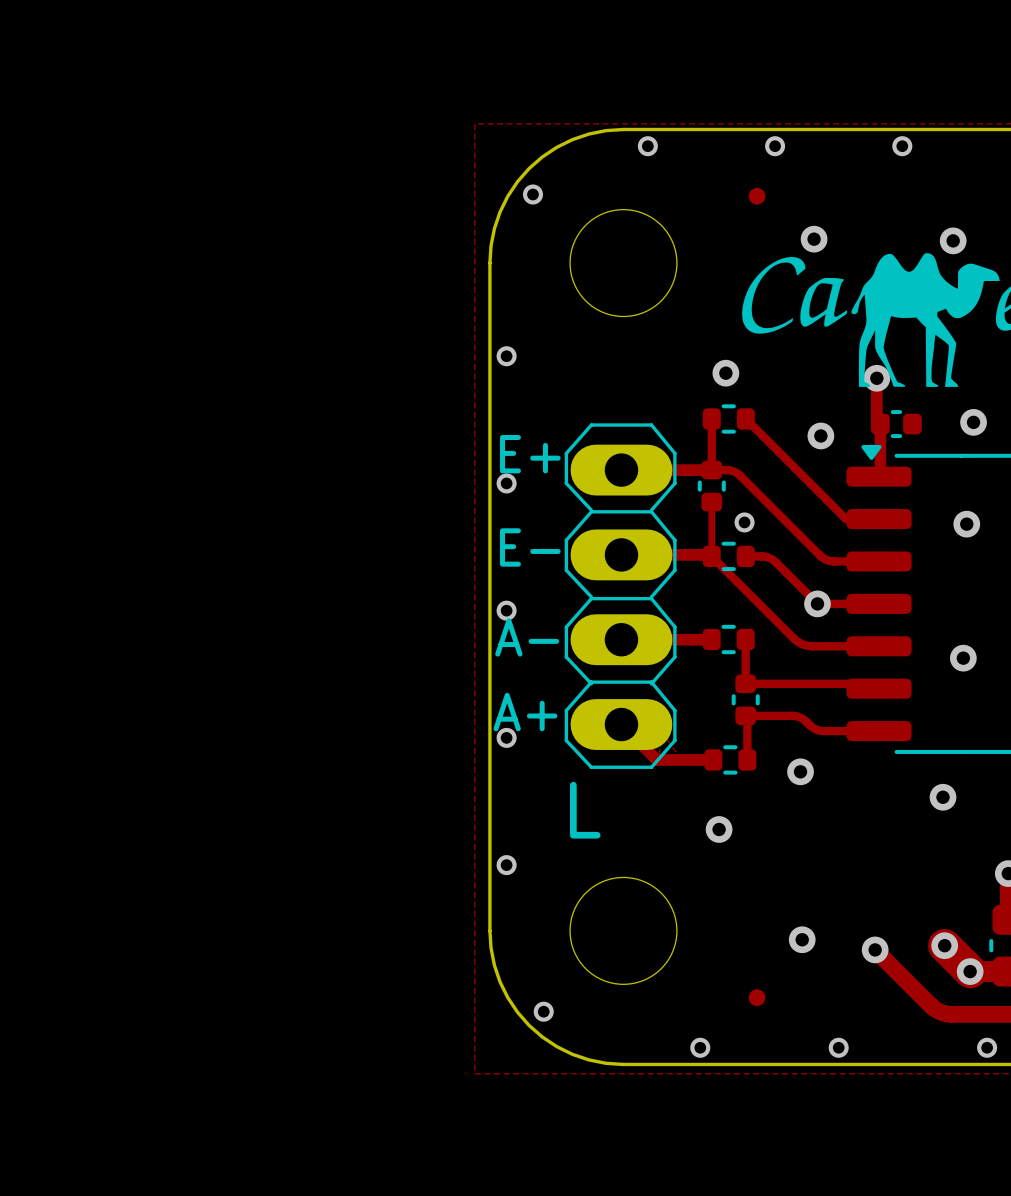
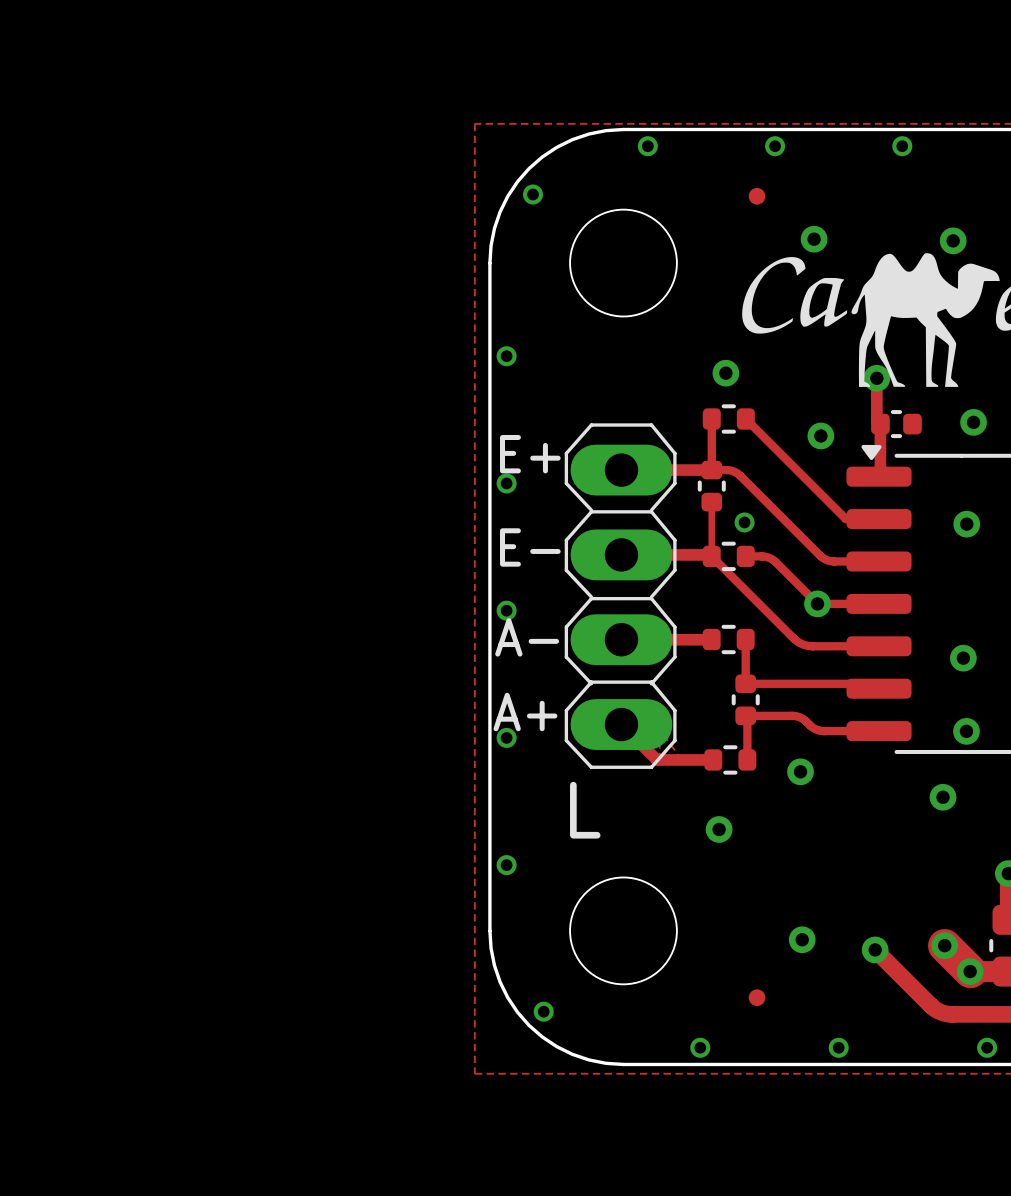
via: none -> (966, 731)

